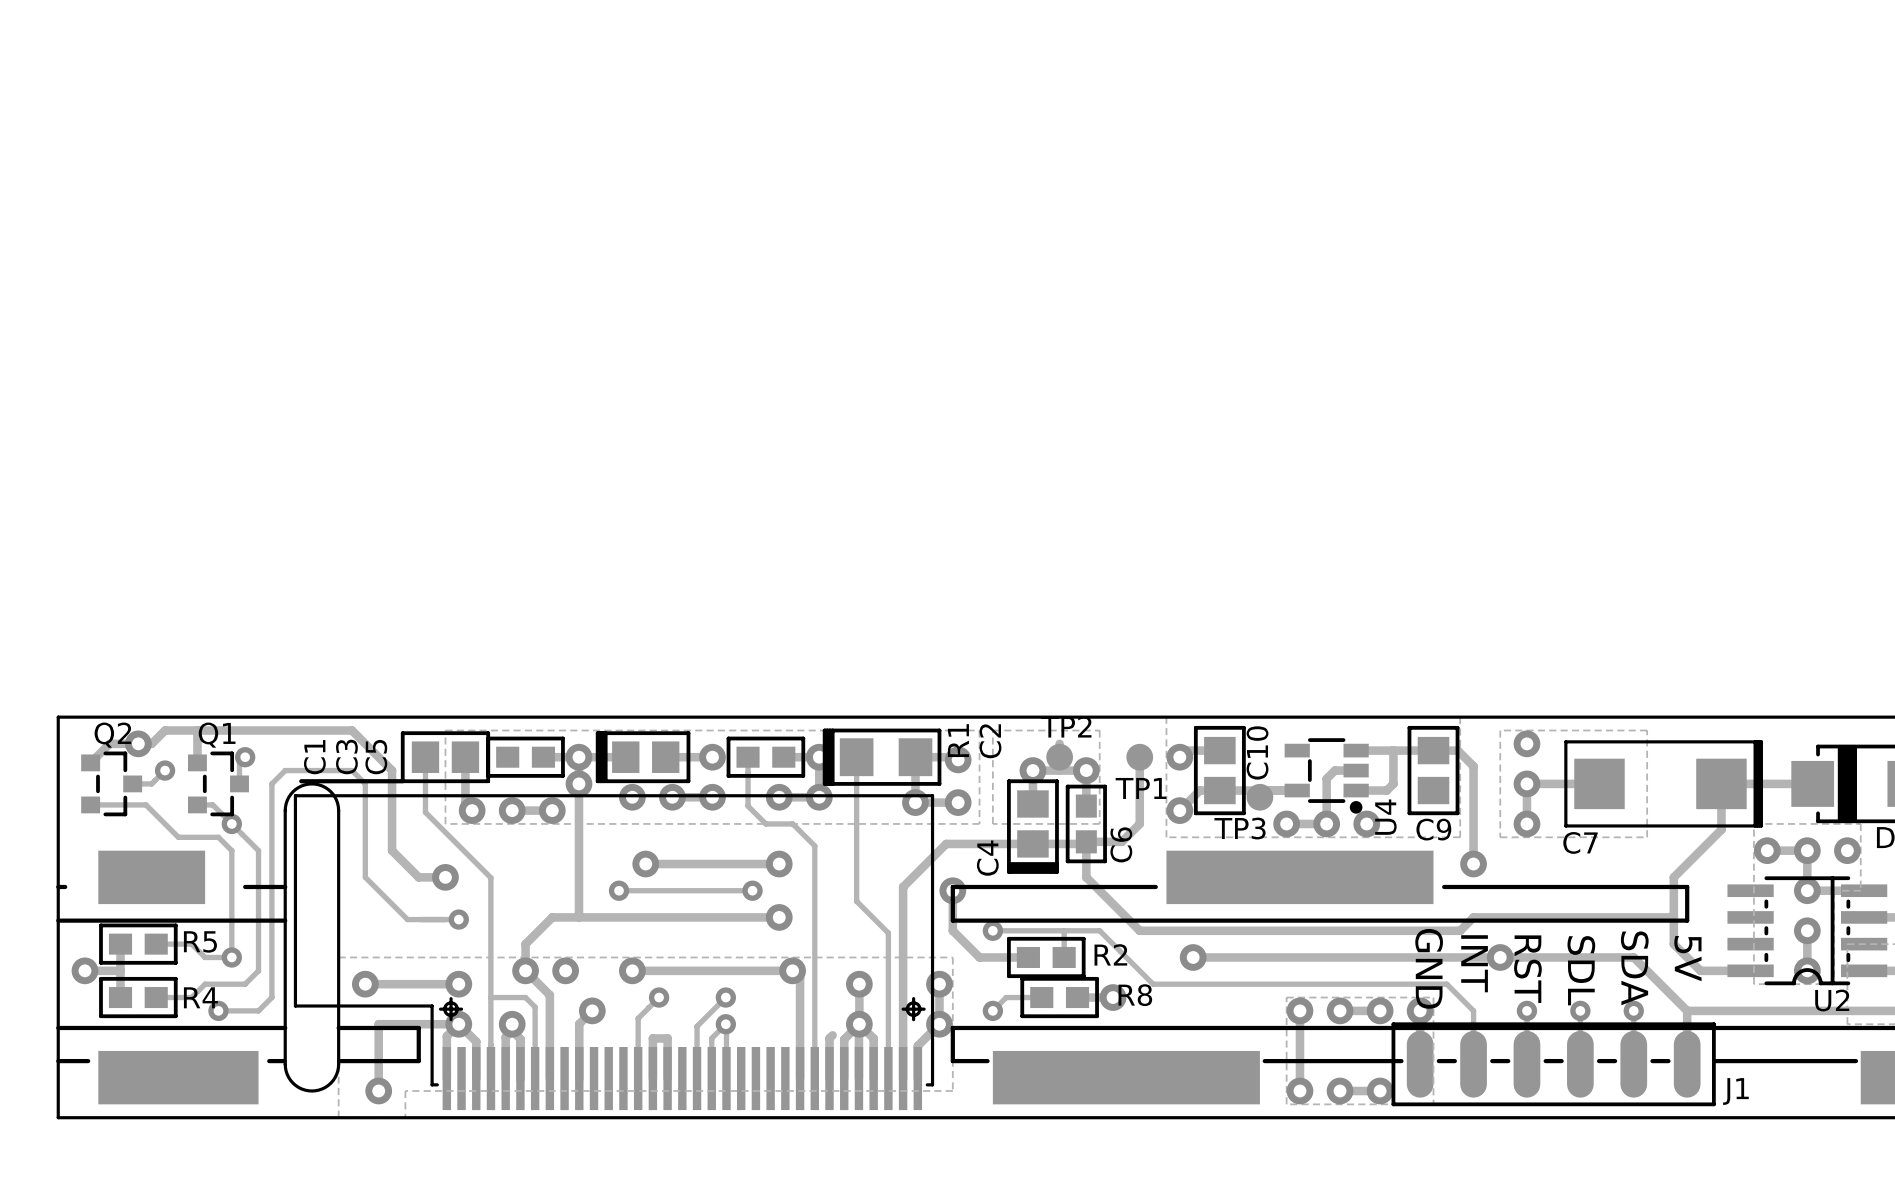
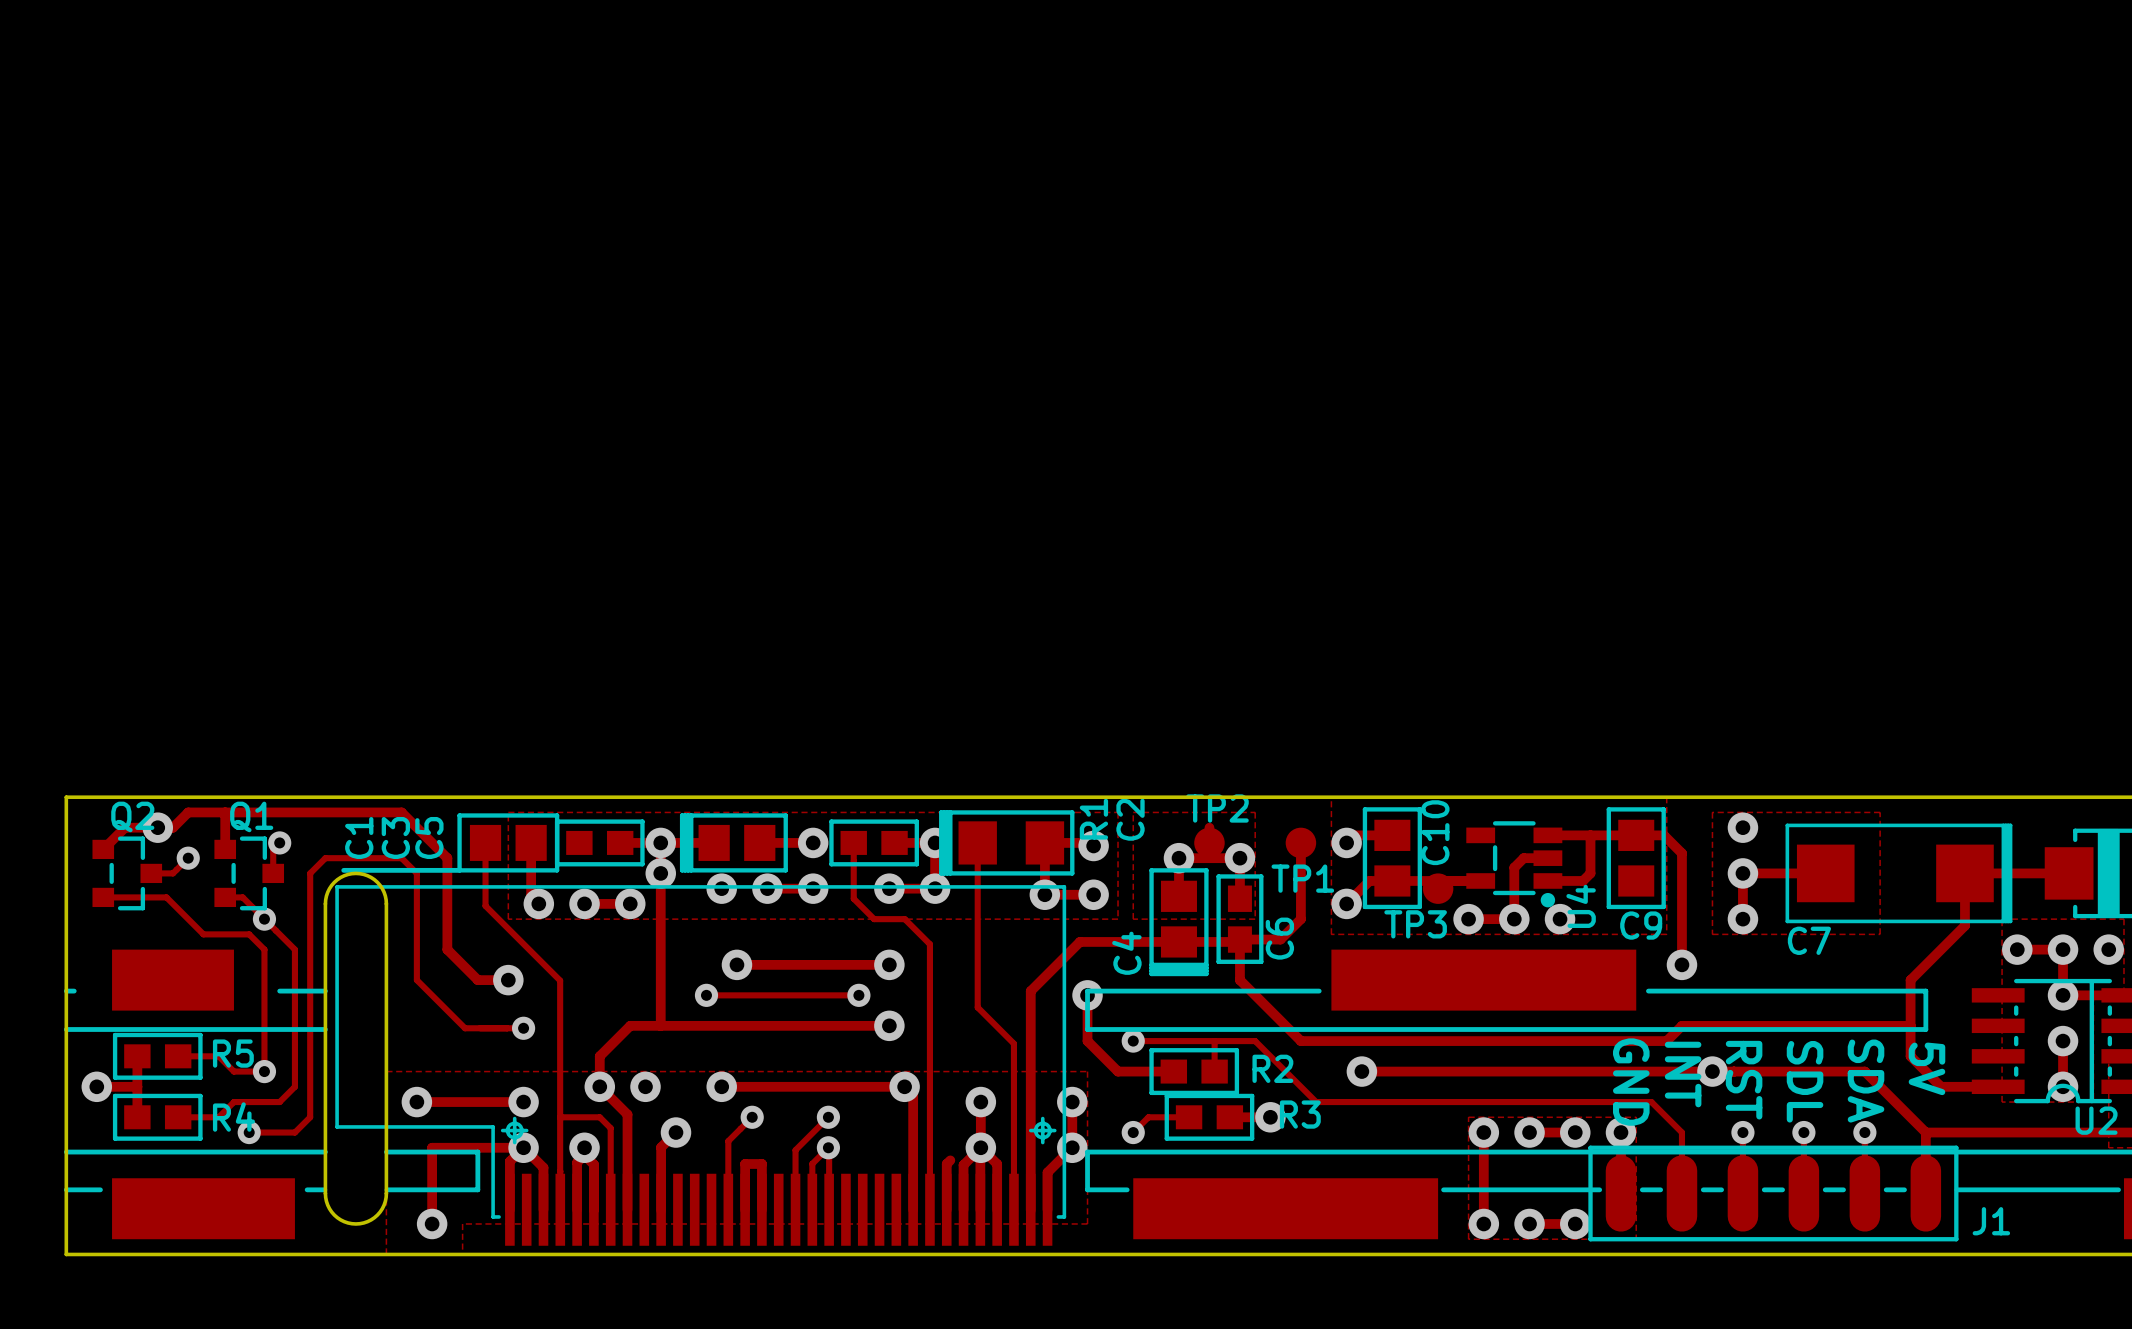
R8 name: R8 (1135, 995) -> R3 (1300, 1114)

